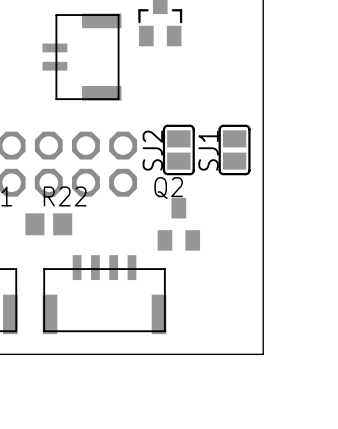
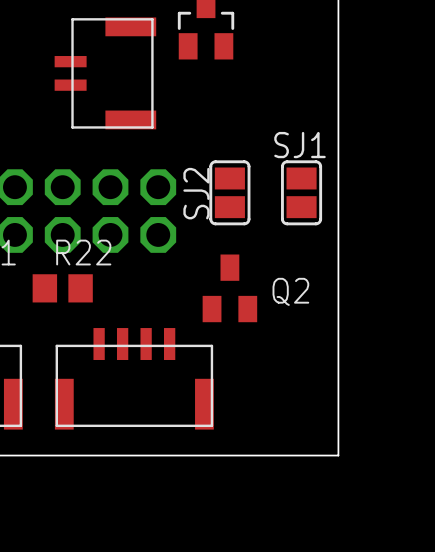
SJ1 name rotation: 0° (208, 150) -> 90° clockwise (299, 145)
Q2 name position: Q2 (168, 188) -> Q2 (290, 291)

